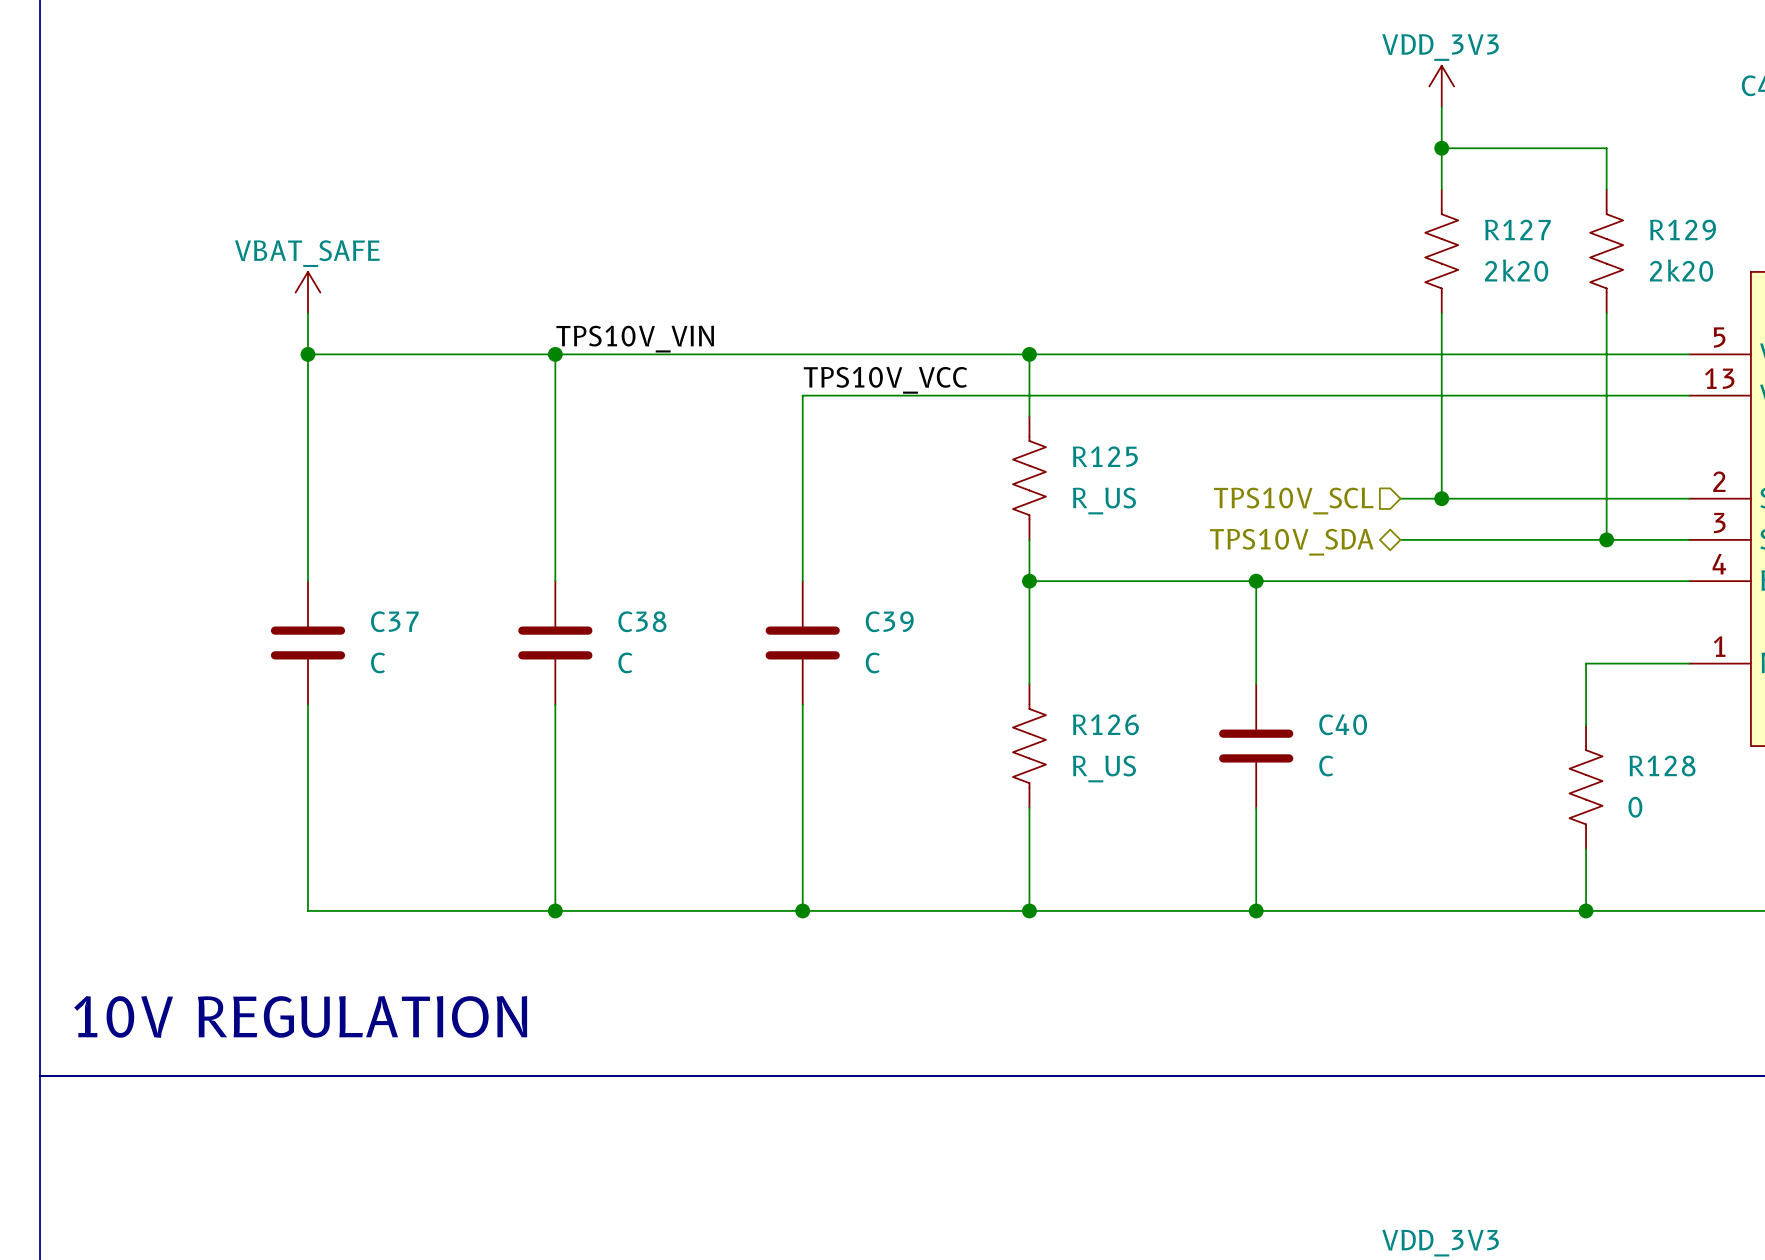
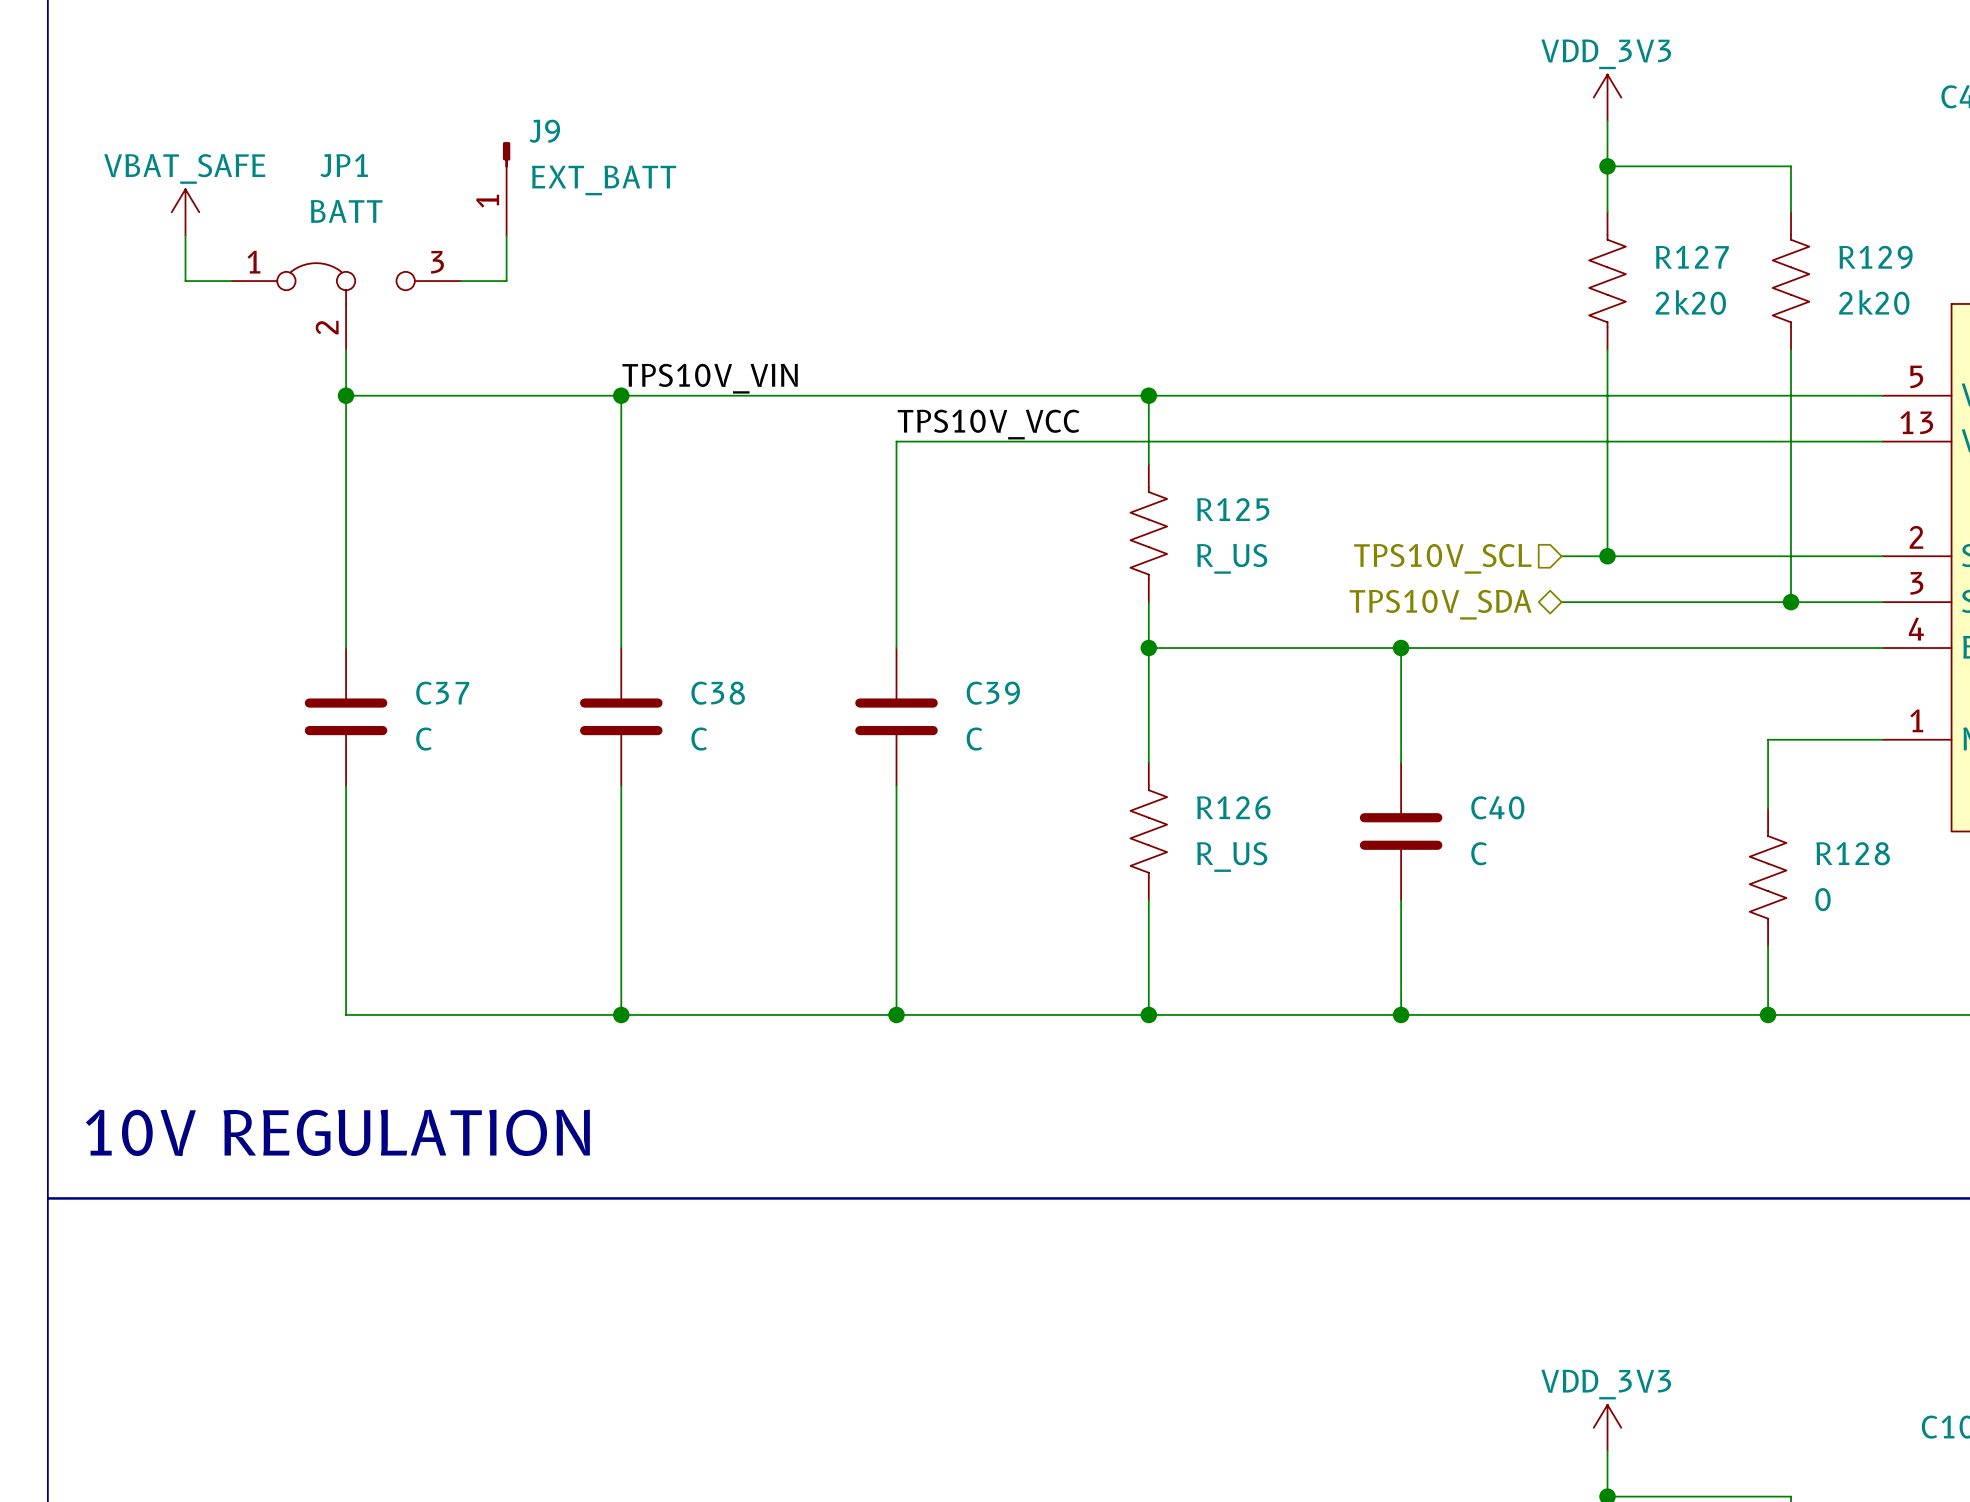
J9: none -> EXT_BATT (506, 188)
wire: none -> (185, 235) (185, 281) (231, 281)
wire: none -> (506, 235) (506, 281) (460, 281)
JP1: none -> BATT (346, 306)
power symbol position: VBAT_SAFE (307, 292) -> VBAT_SAFE (185, 212)

